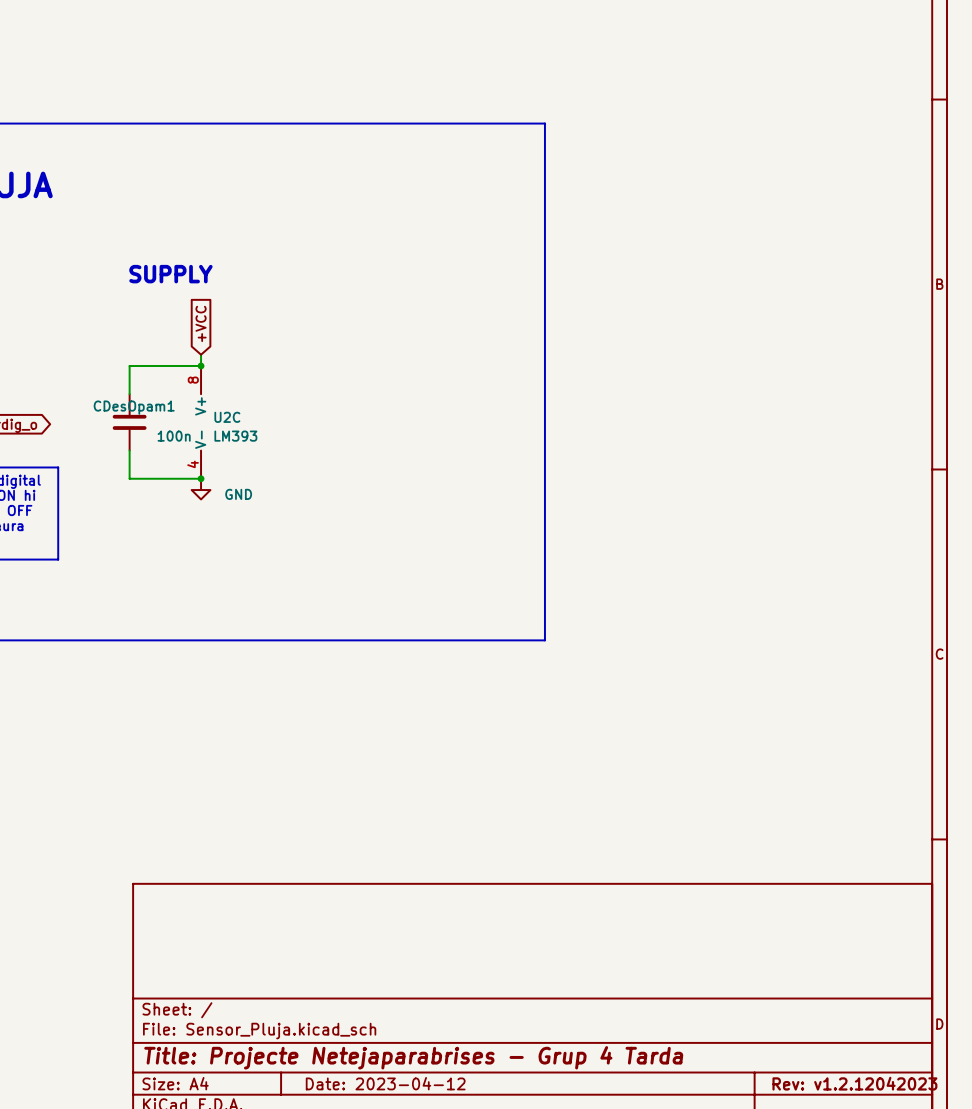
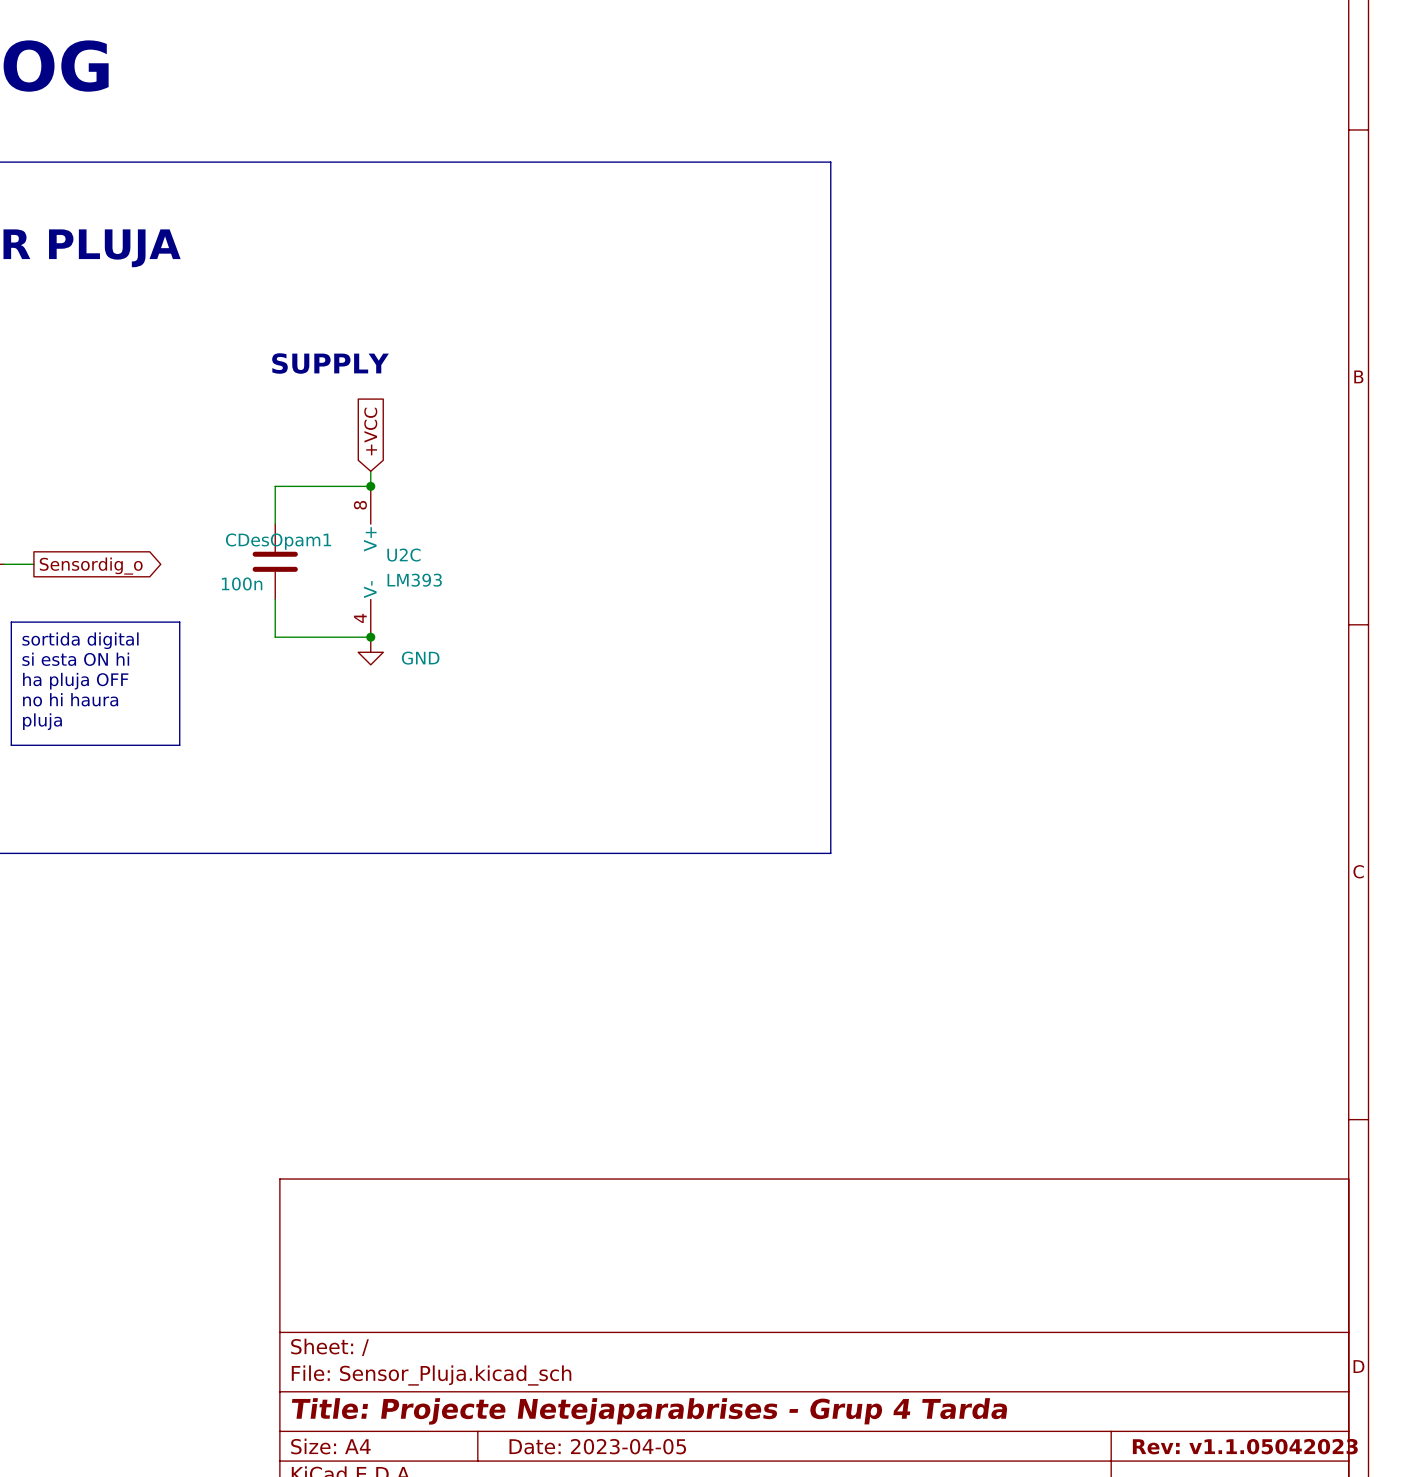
CDesOpam1 value position: 100n (174, 436) -> 100n (242, 583)
title block: Date: 2023-04-12 (385, 1083) -> Date: 2023-04-05 (597, 1446)
title block: Rev: v1.2.12042023 (854, 1083) -> Rev: v1.1.05042023 (1245, 1446)

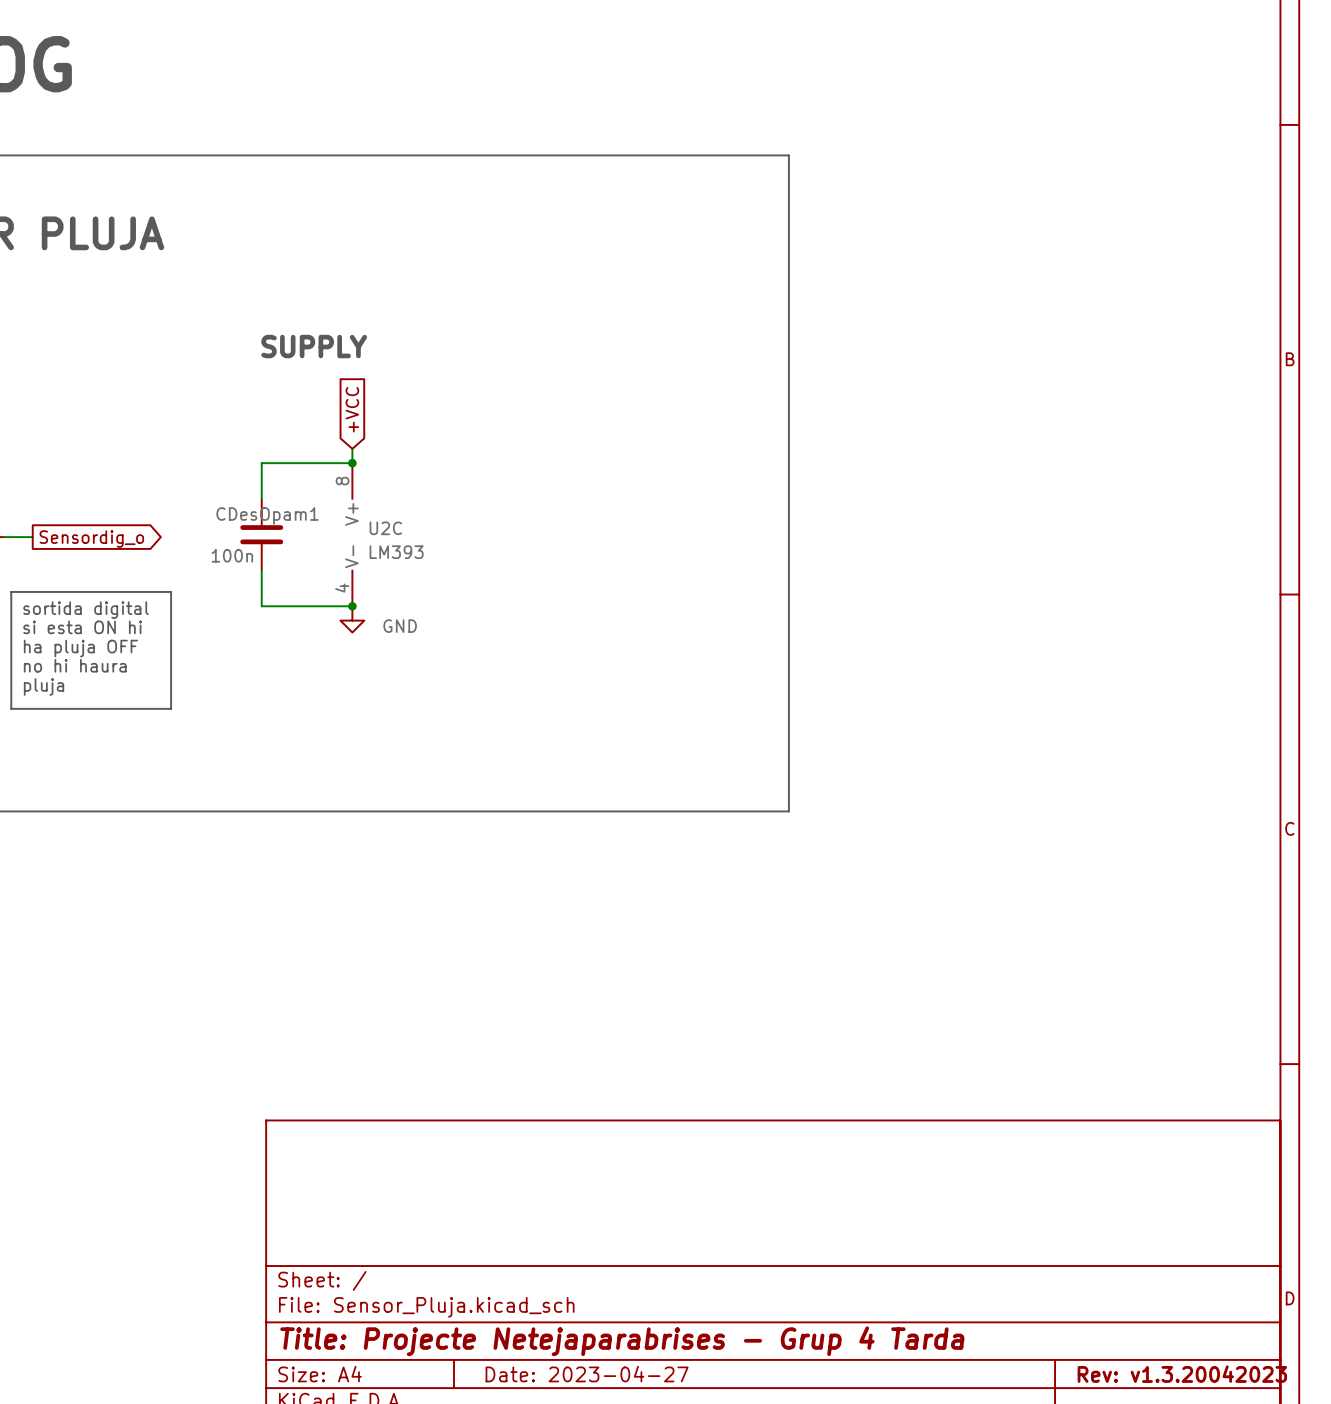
title block: Date: 2023-04-05 (597, 1446) -> Date: 2023-04-27 (587, 1374)
title block: Rev: v1.1.05042023 (1245, 1446) -> Rev: v1.3.20042023 (1182, 1374)

